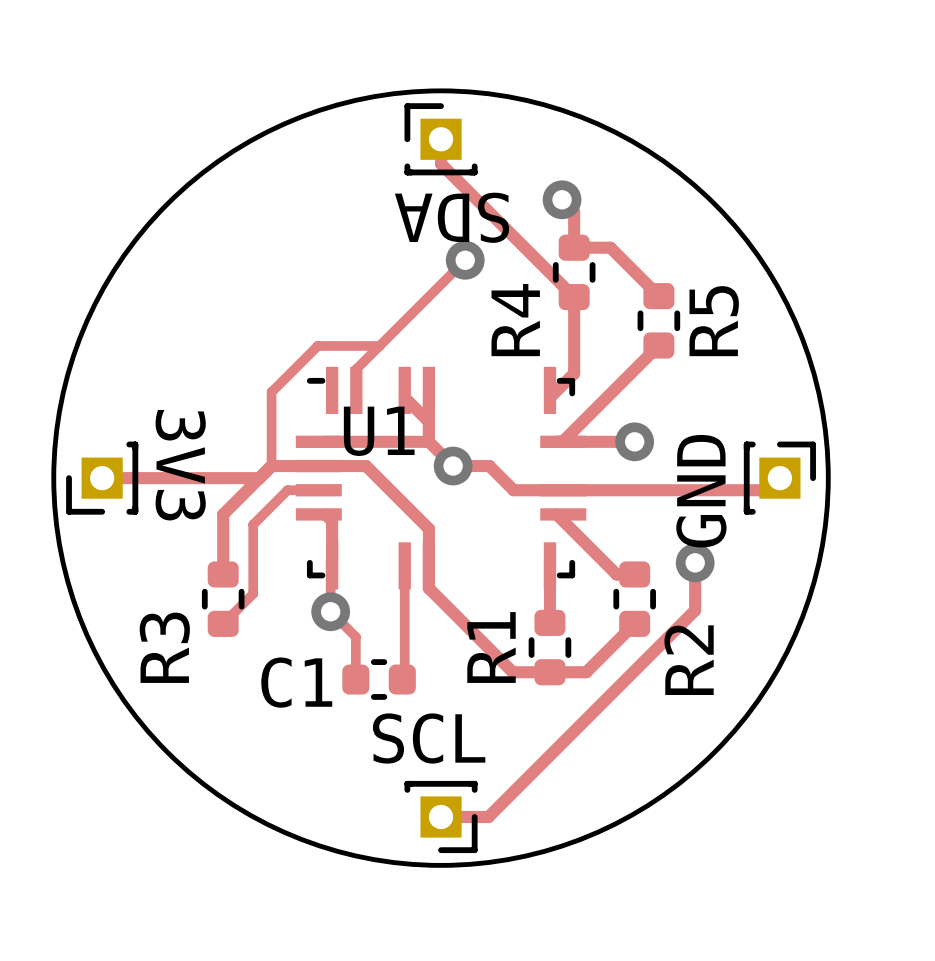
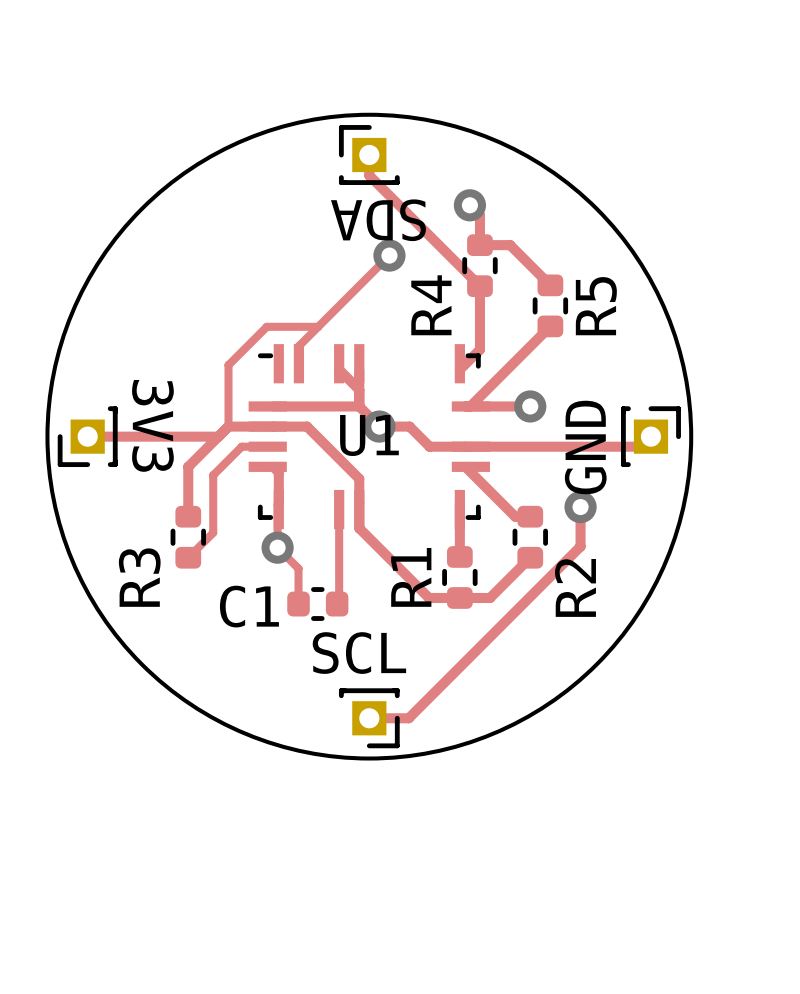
U1 name position: U1 (379, 431) -> U1 (369, 435)

